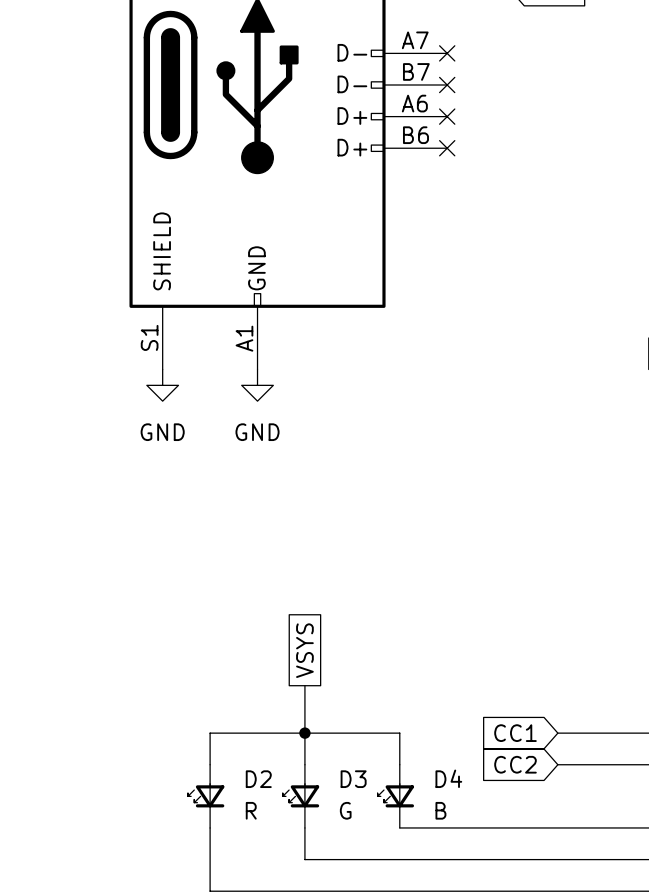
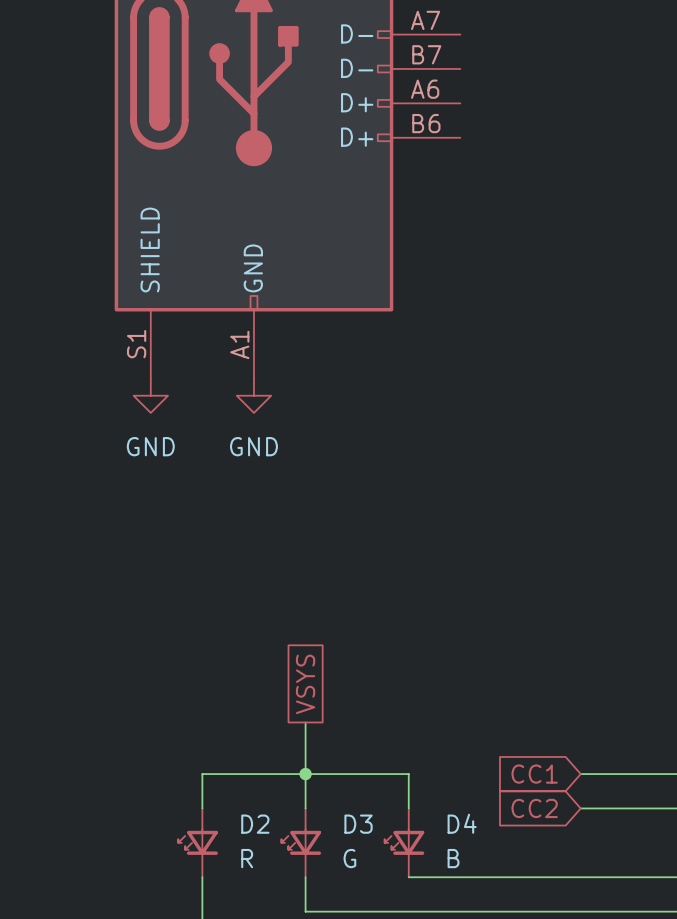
no-connect mark: (447, 53) -> none
no-connect mark: (447, 84) -> none
no-connect mark: (447, 116) -> none
no-connect mark: (447, 148) -> none

